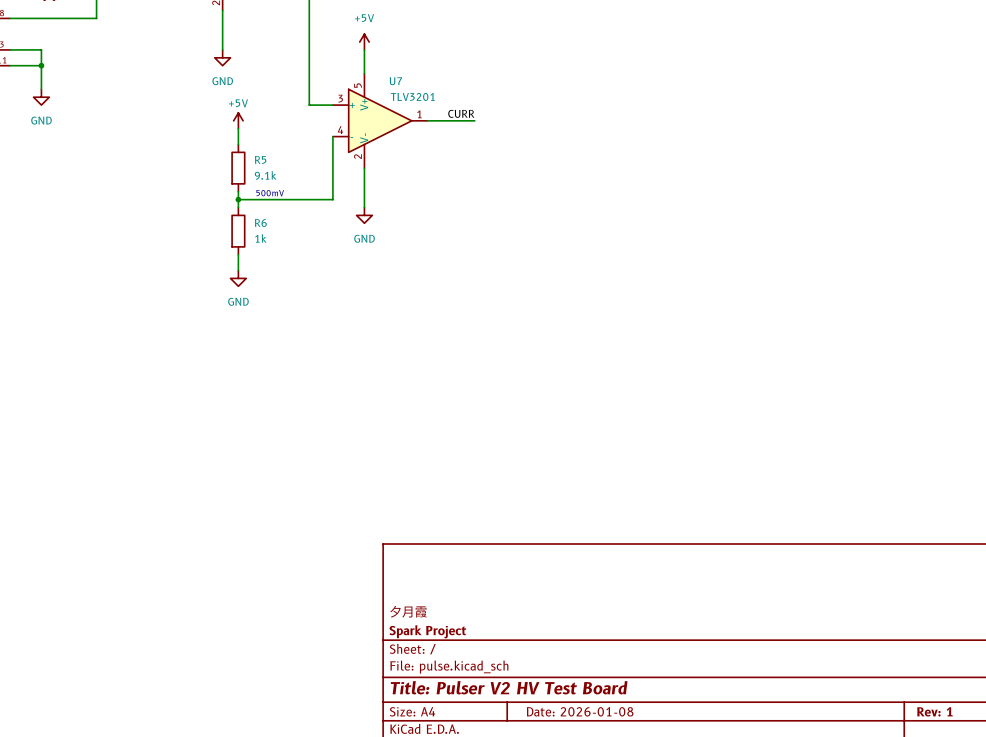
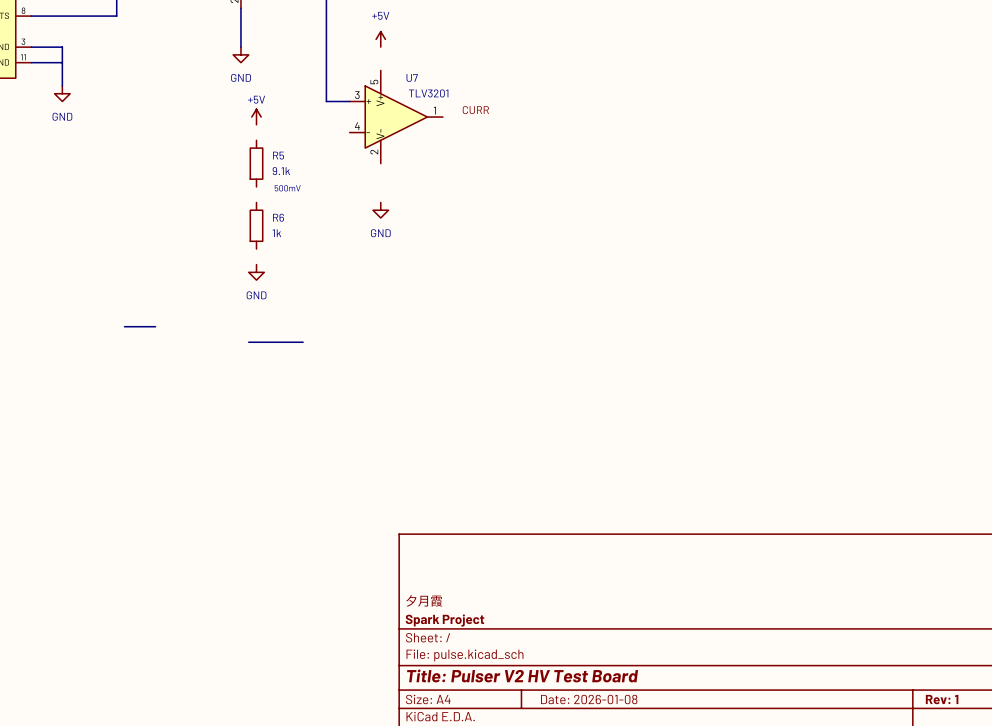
wire: (364, 49) (364, 73) -> none
junction: (41, 65) -> none
wire: (427, 120) (474, 120) -> none
wire: (238, 128) (238, 144) -> none
wire: (332, 136) (332, 199) (238, 199) -> none
wire: (364, 168) (364, 207) -> none
wire: (238, 191) (238, 207) -> none
junction: (238, 199) -> none
wire: (238, 254) (238, 270) -> none
wire: none -> (124, 326) (155, 326)
wire: none -> (248, 342) (303, 342)

